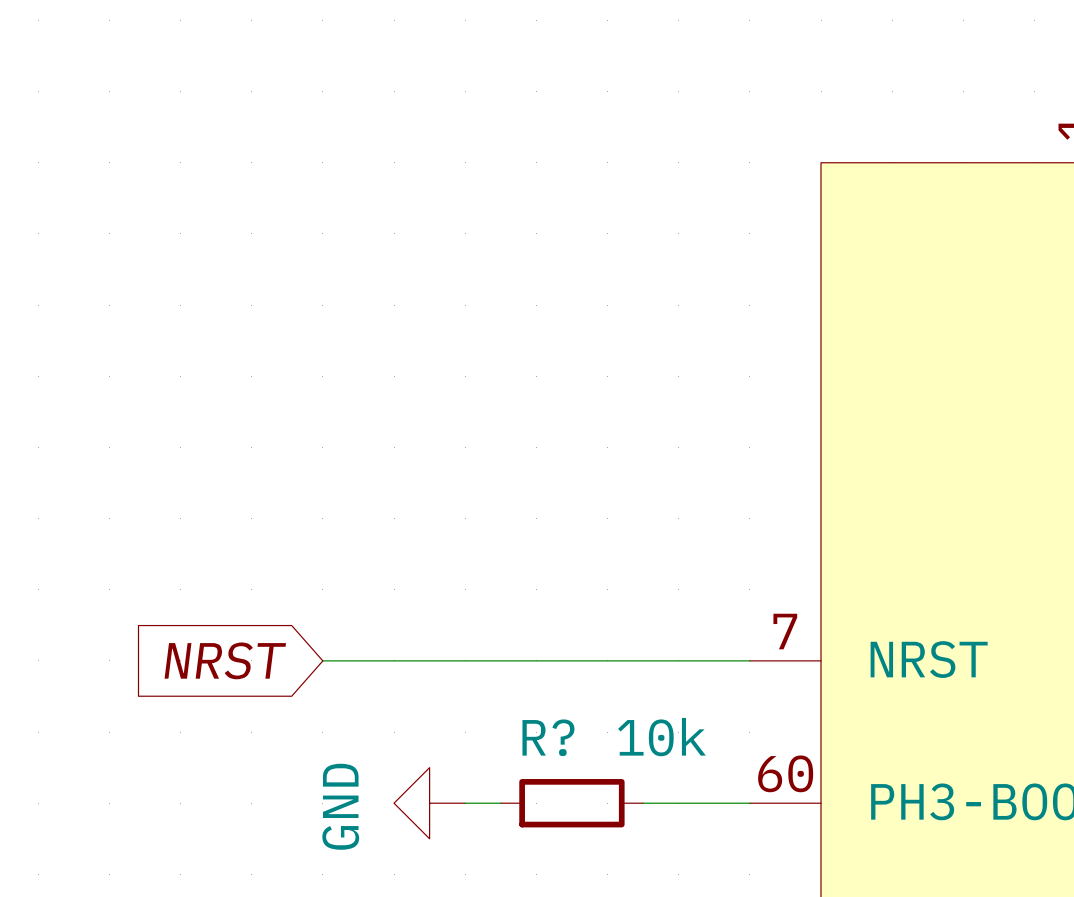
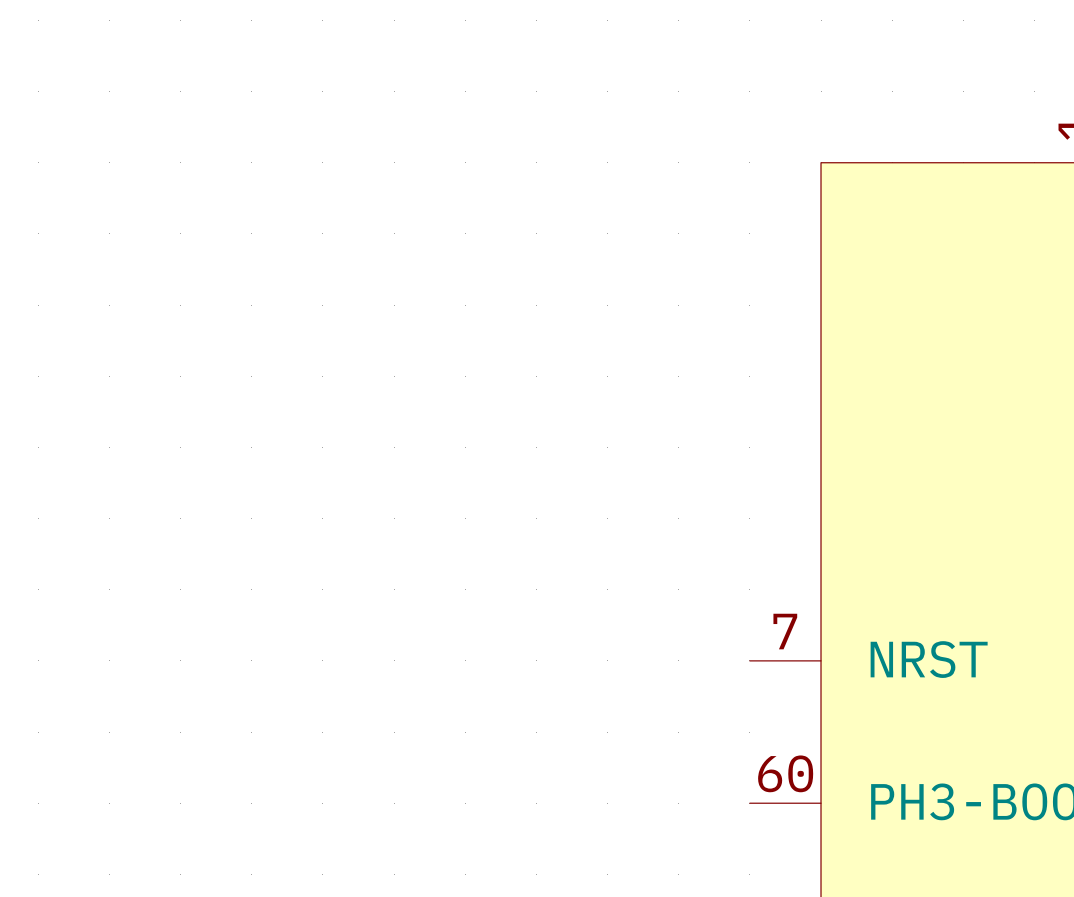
global label: NRST (225, 660) -> none
wire: (322, 660) (749, 660) -> none
power symbol: GND (429, 803) -> none
wire: (465, 803) (500, 803) -> none
R?: 10k (571, 803) -> none
wire: (643, 803) (749, 803) -> none

